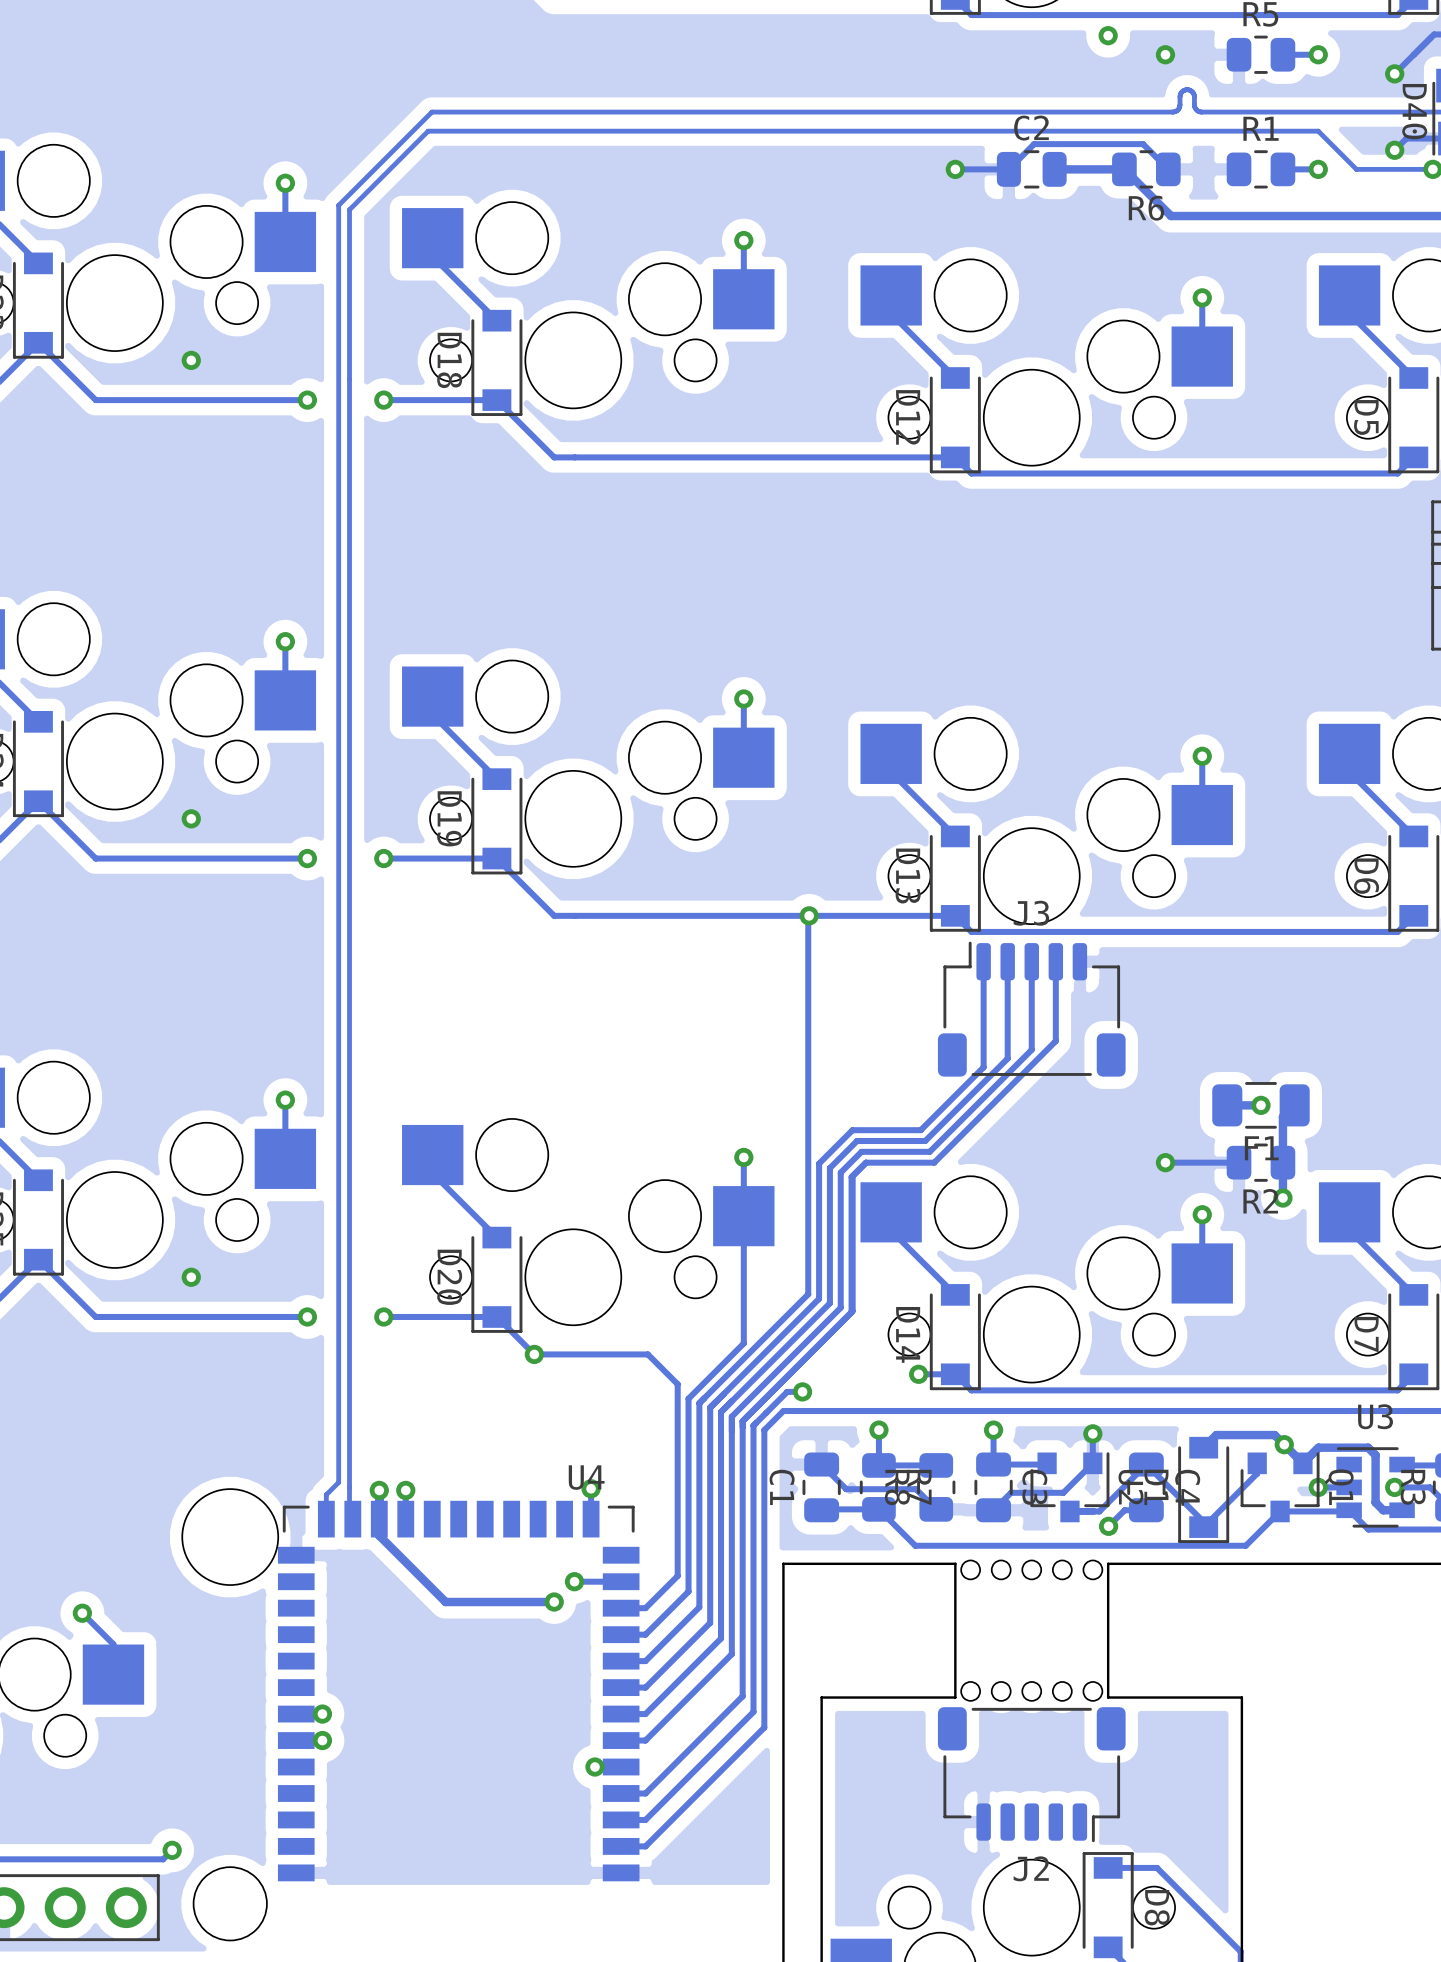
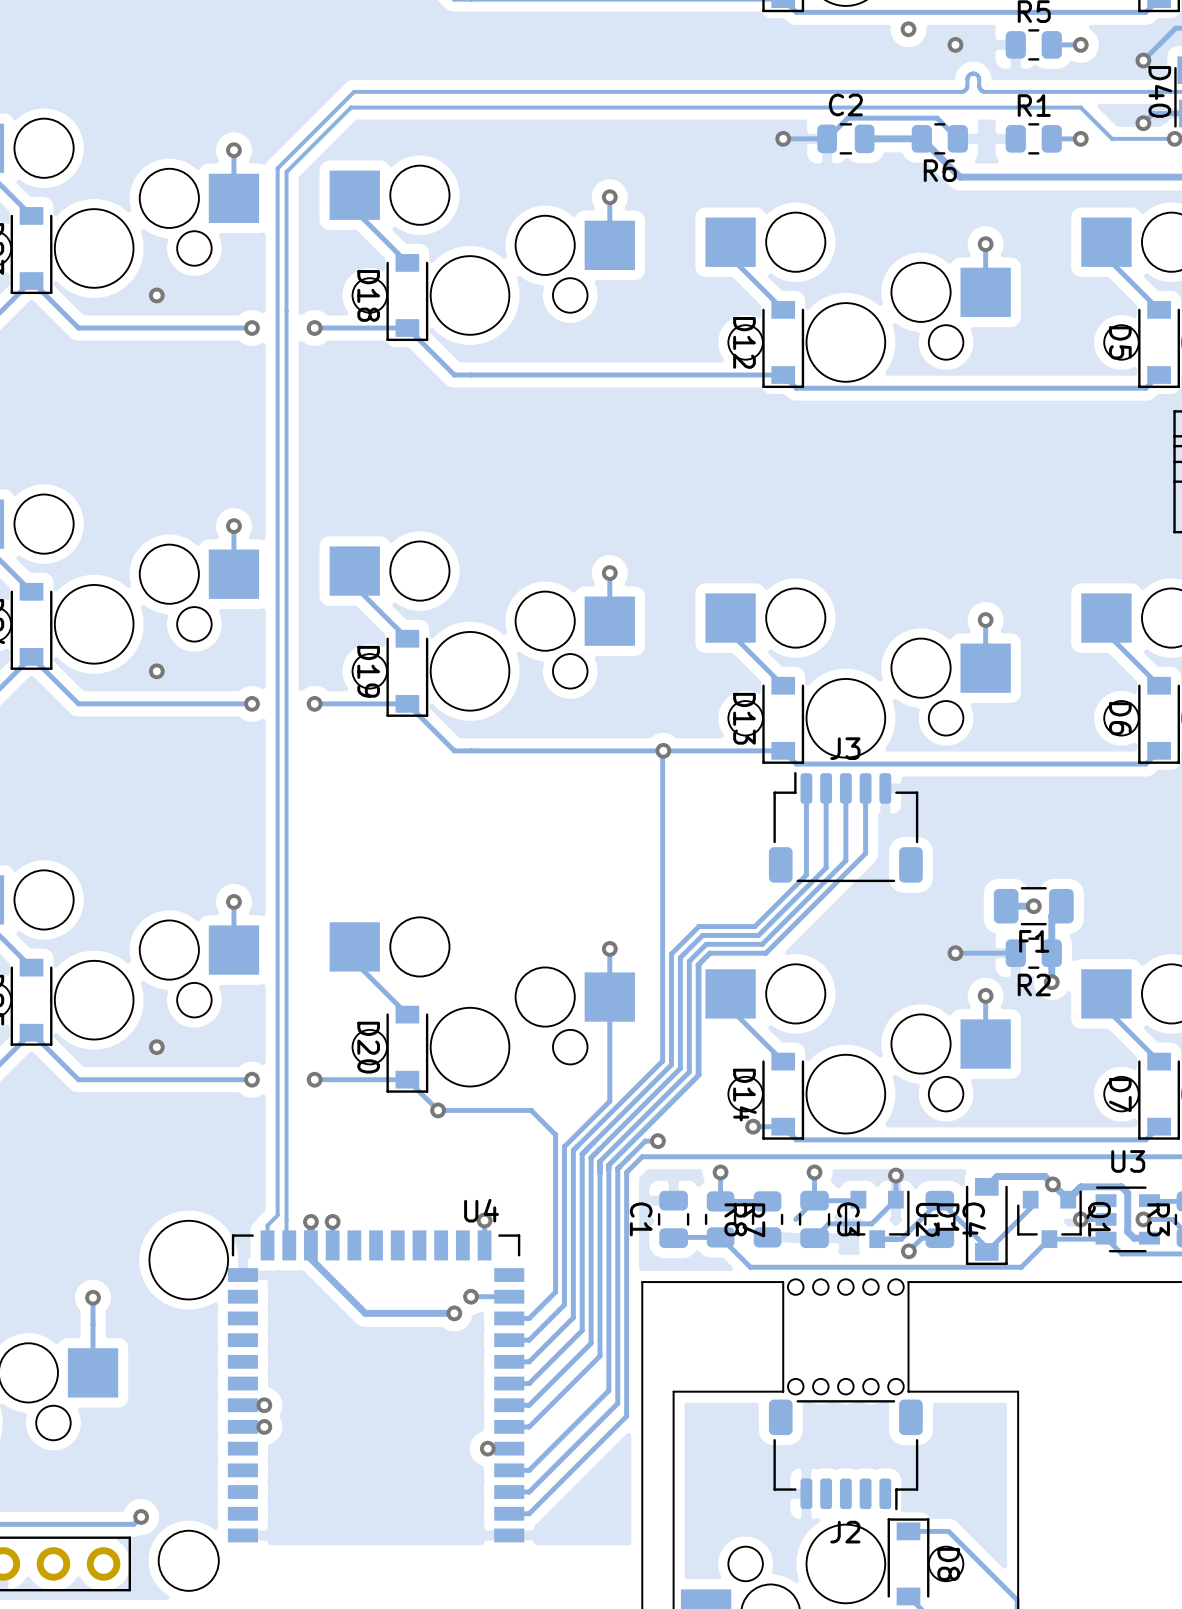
track: (821, 1464) (846, 1489) (916, 1489) (936, 1509) -> none
track: none -> (814, 1200) (795, 1219)
track: (82, 1613) (113, 1644) -> (93, 1297) (93, 1348)
via position: (82, 1613) -> (93, 1297)

